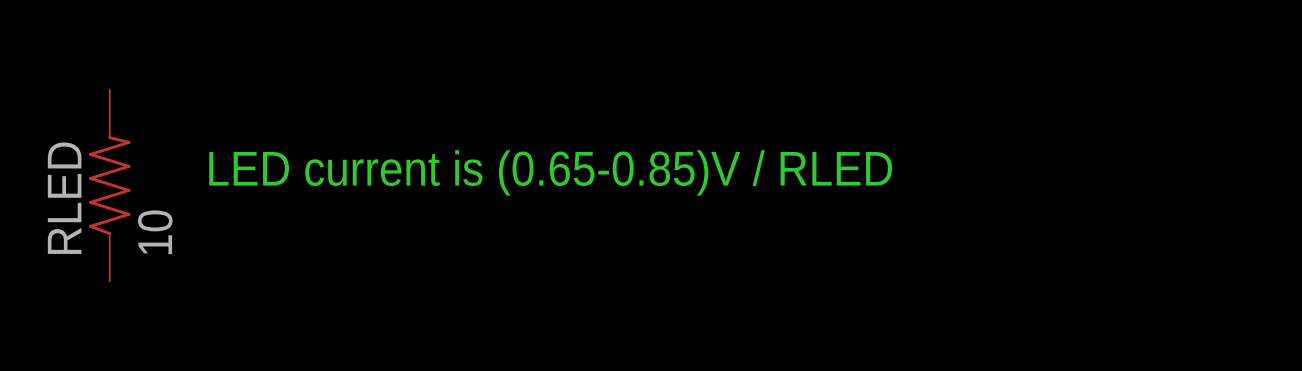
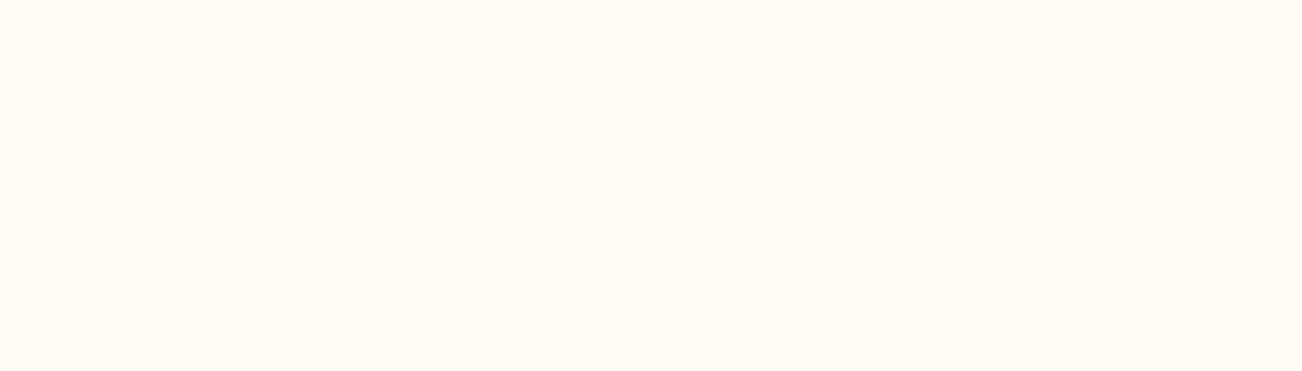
text: LED current is (0.65-0.85)V / RLED (550, 172) -> none
RLED: 10 (109, 185) -> none

